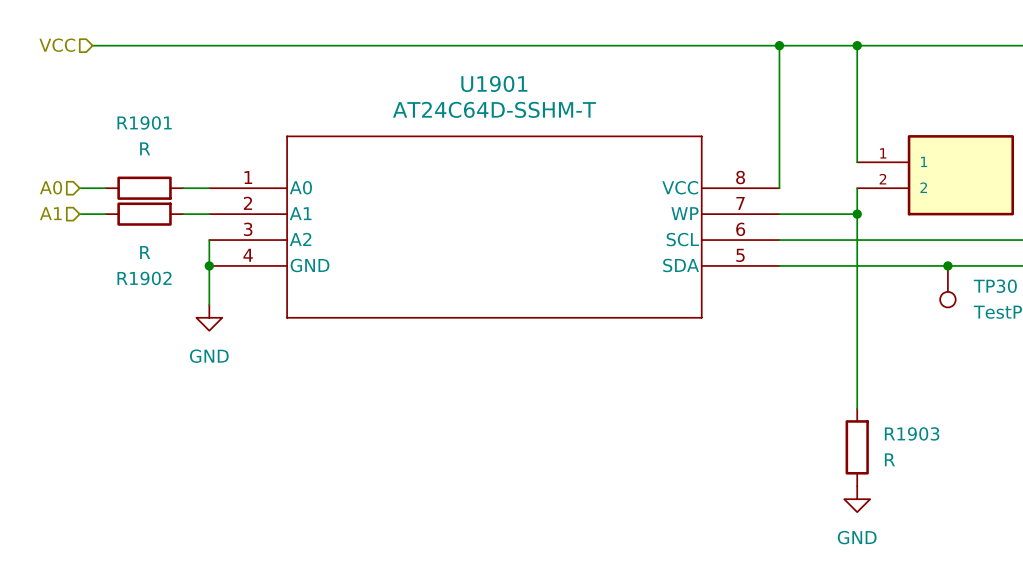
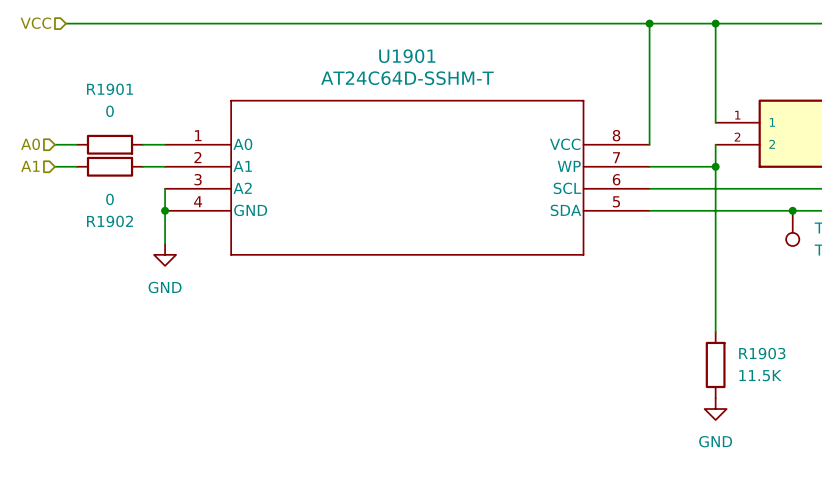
R1901 value: R (145, 148) -> 0 (110, 111)
R1902 value: R (145, 252) -> 0 (110, 199)
R1903 value: R (889, 459) -> 11.5K (760, 375)

